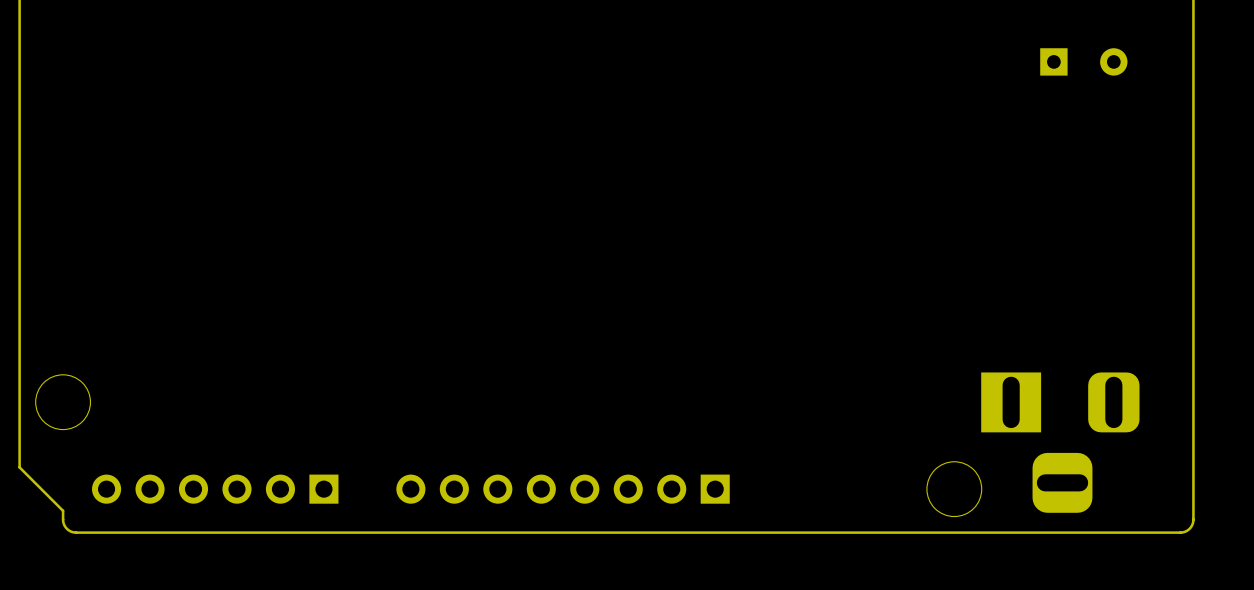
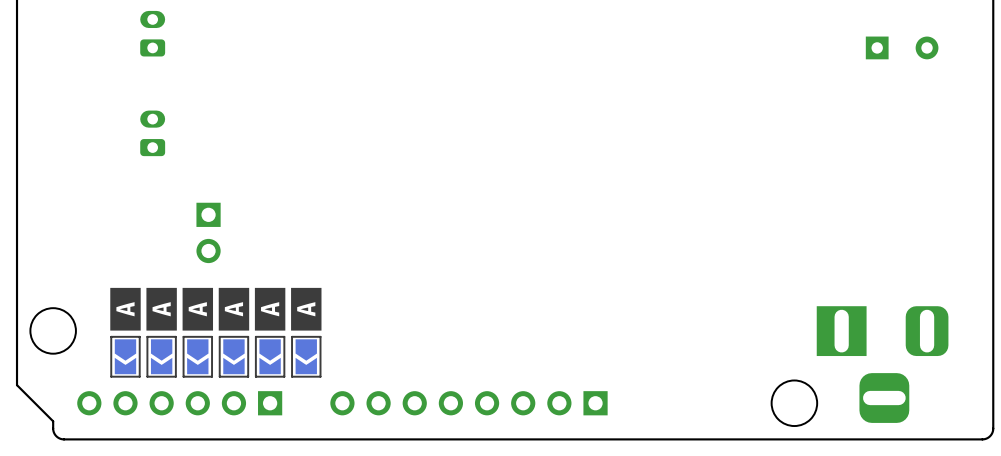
part: none -> (152, 33)
part: none -> (152, 133)
part: none -> (208, 232)
drawing: none -> [110, 287, 322, 331]
part: none -> (125, 356)
part: none -> (161, 356)
part: none -> (197, 356)
part: none -> (233, 356)
part: none -> (270, 356)
part: none -> (306, 356)

